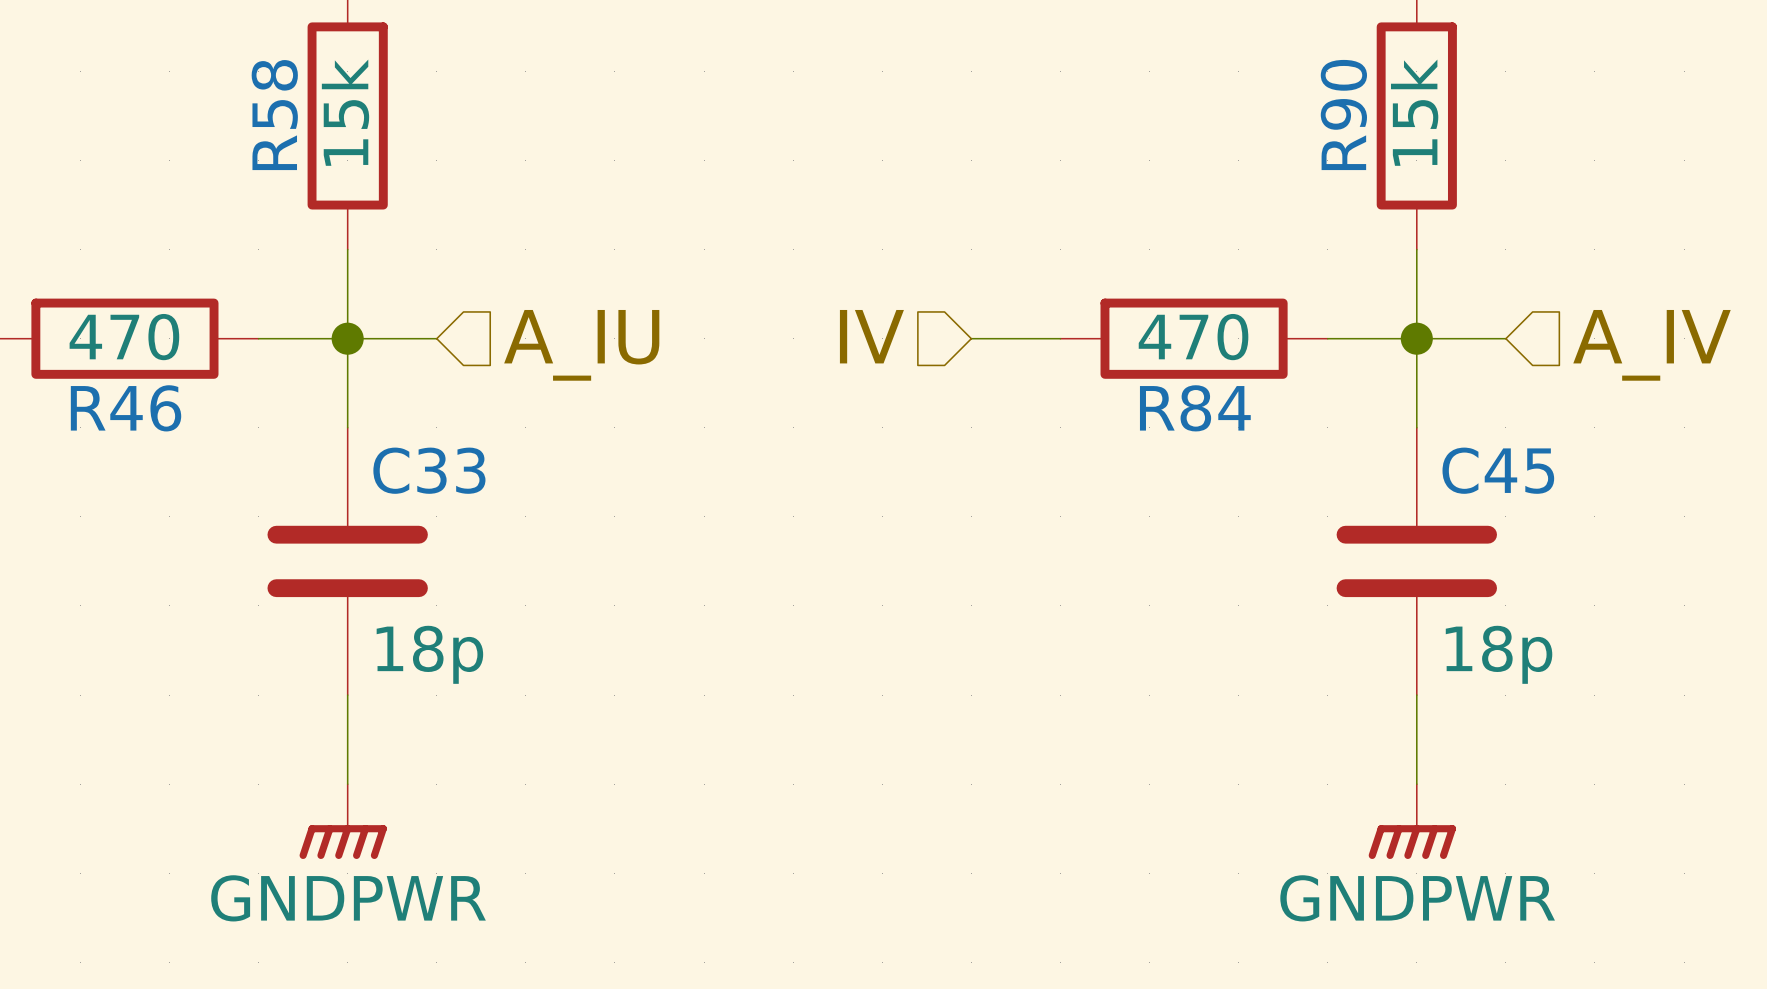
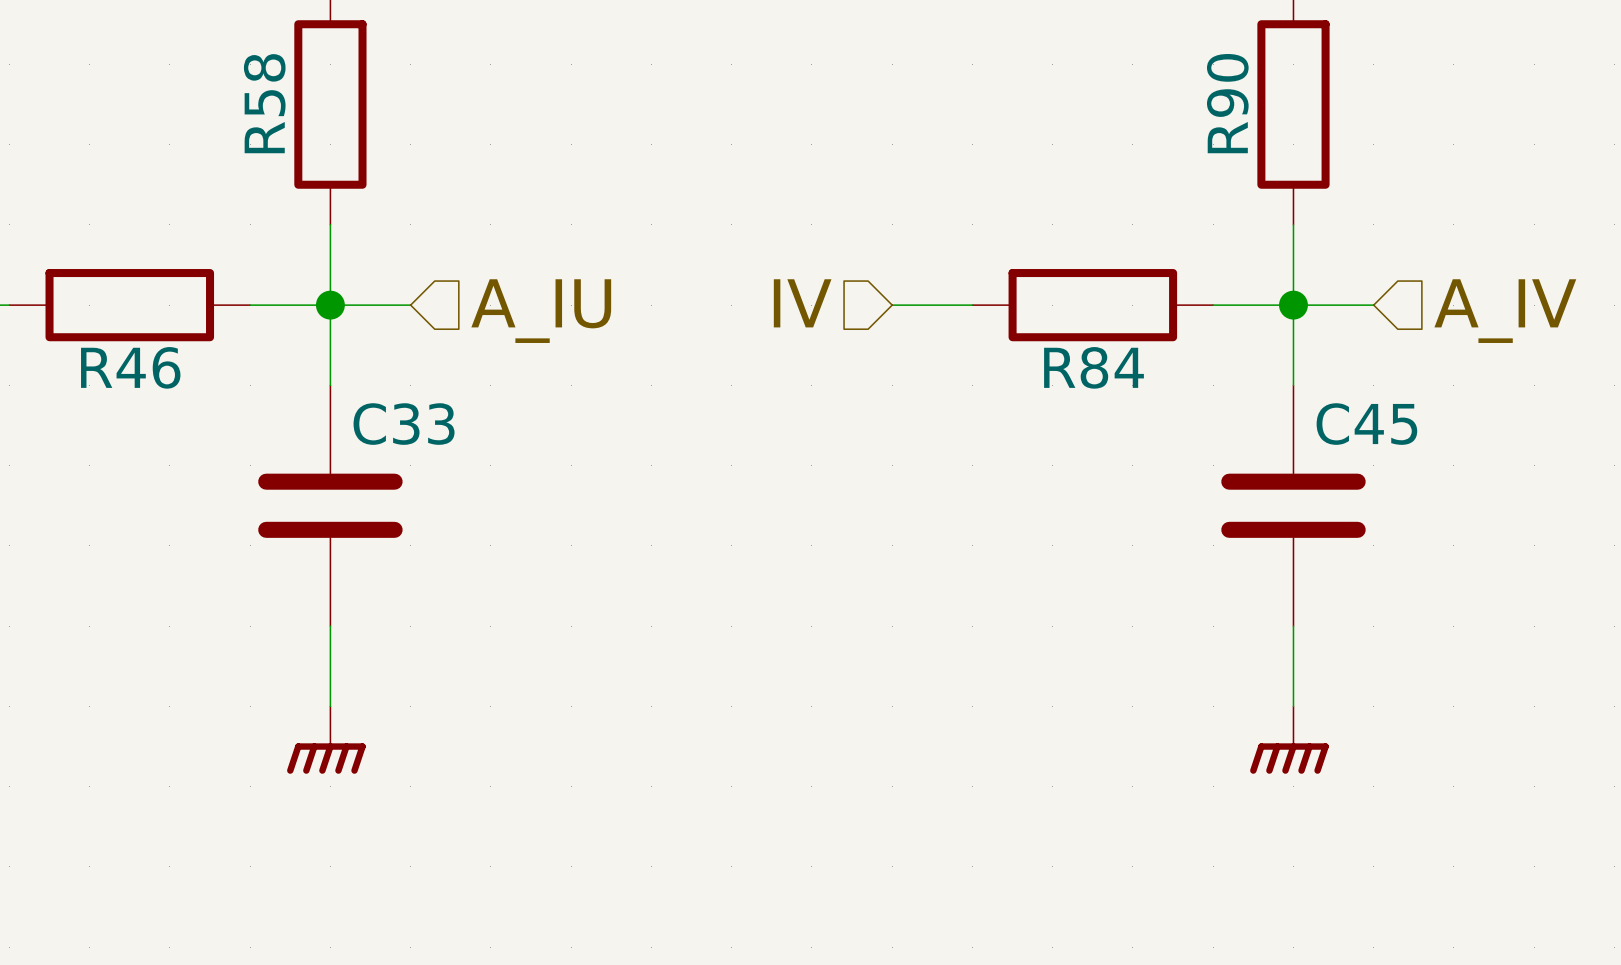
R58 value: 15k (345, 112) -> none
R90 value: 15k (1414, 112) -> none
R46 value: 470 (124, 337) -> none
R84 value: 470 (1193, 337) -> none
C33 value: 18p (429, 654) -> none
C45 value: 18p (1499, 654) -> none
power symbol text: GNDPWR (348, 898) -> none
power symbol text: GNDPWR (1417, 898) -> none

